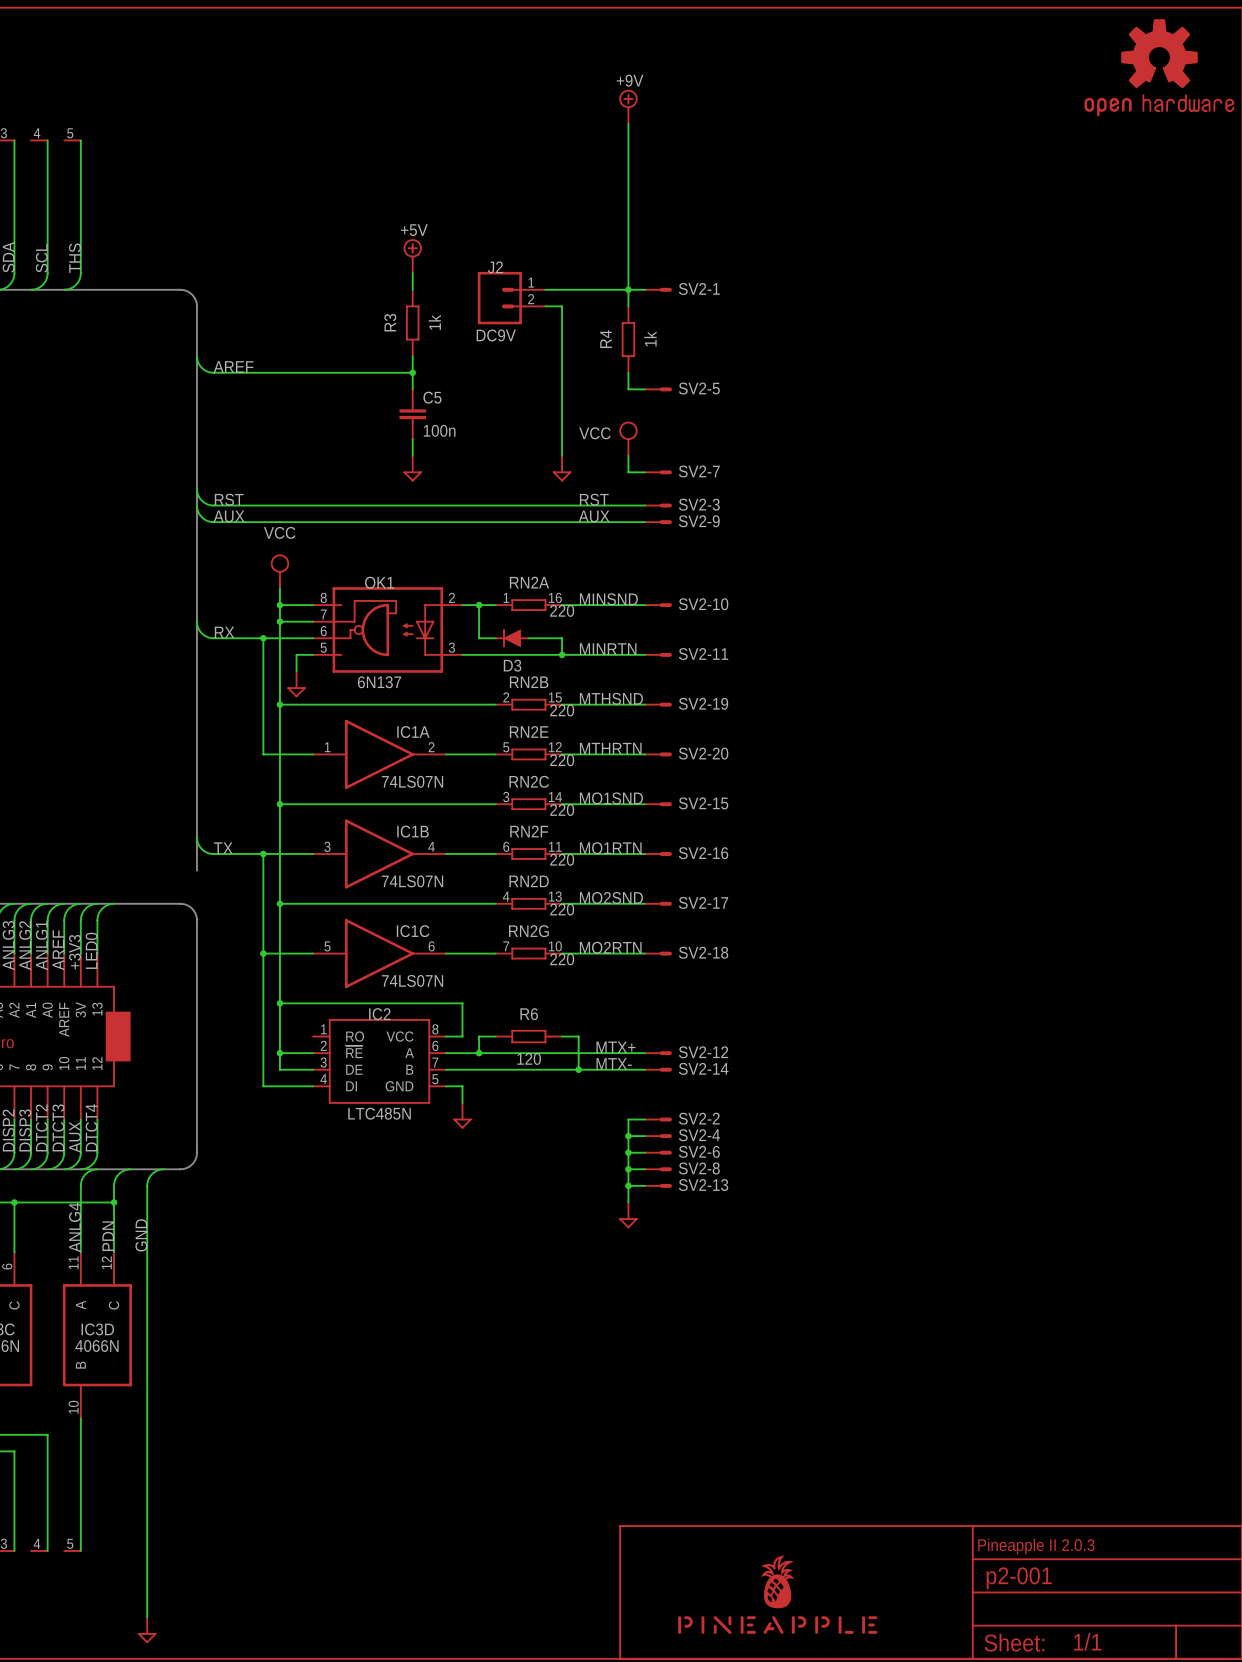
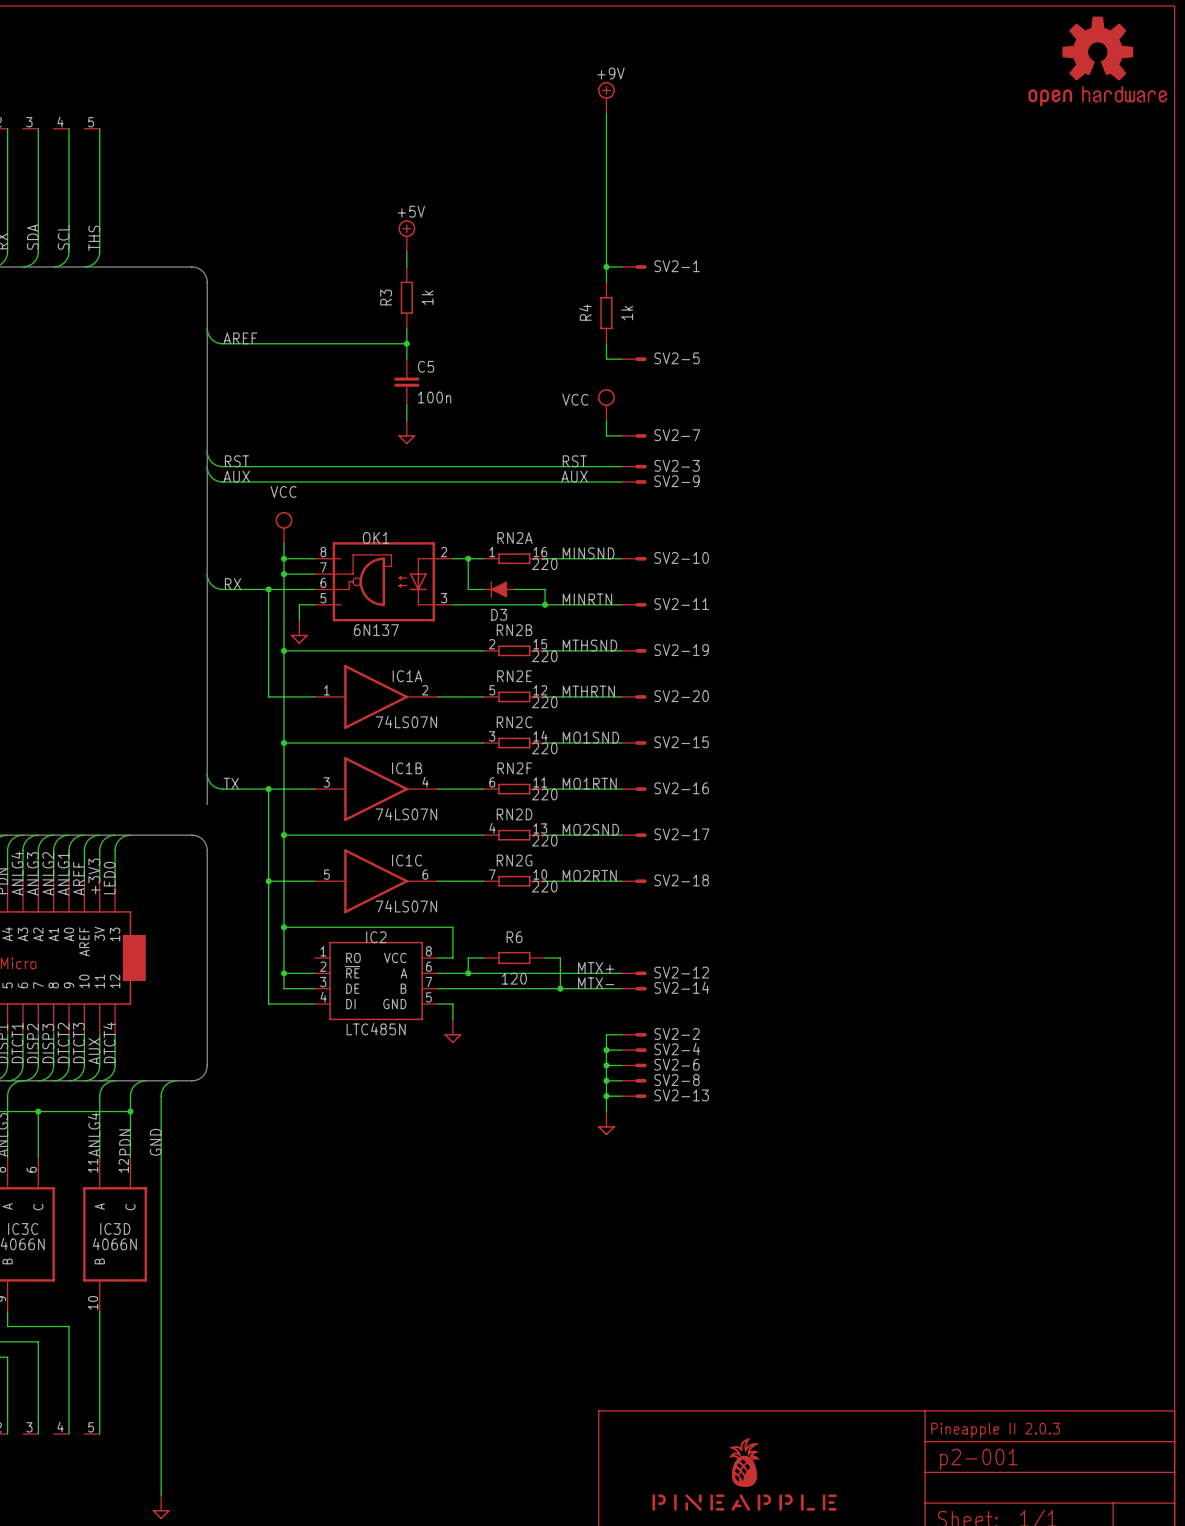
wire: (545, 289) (628, 289) -> none
J2: DC9V (511, 298) -> none
wire: (545, 306) (562, 306) (562, 455) -> none
power symbol: (562, 468) -> none

